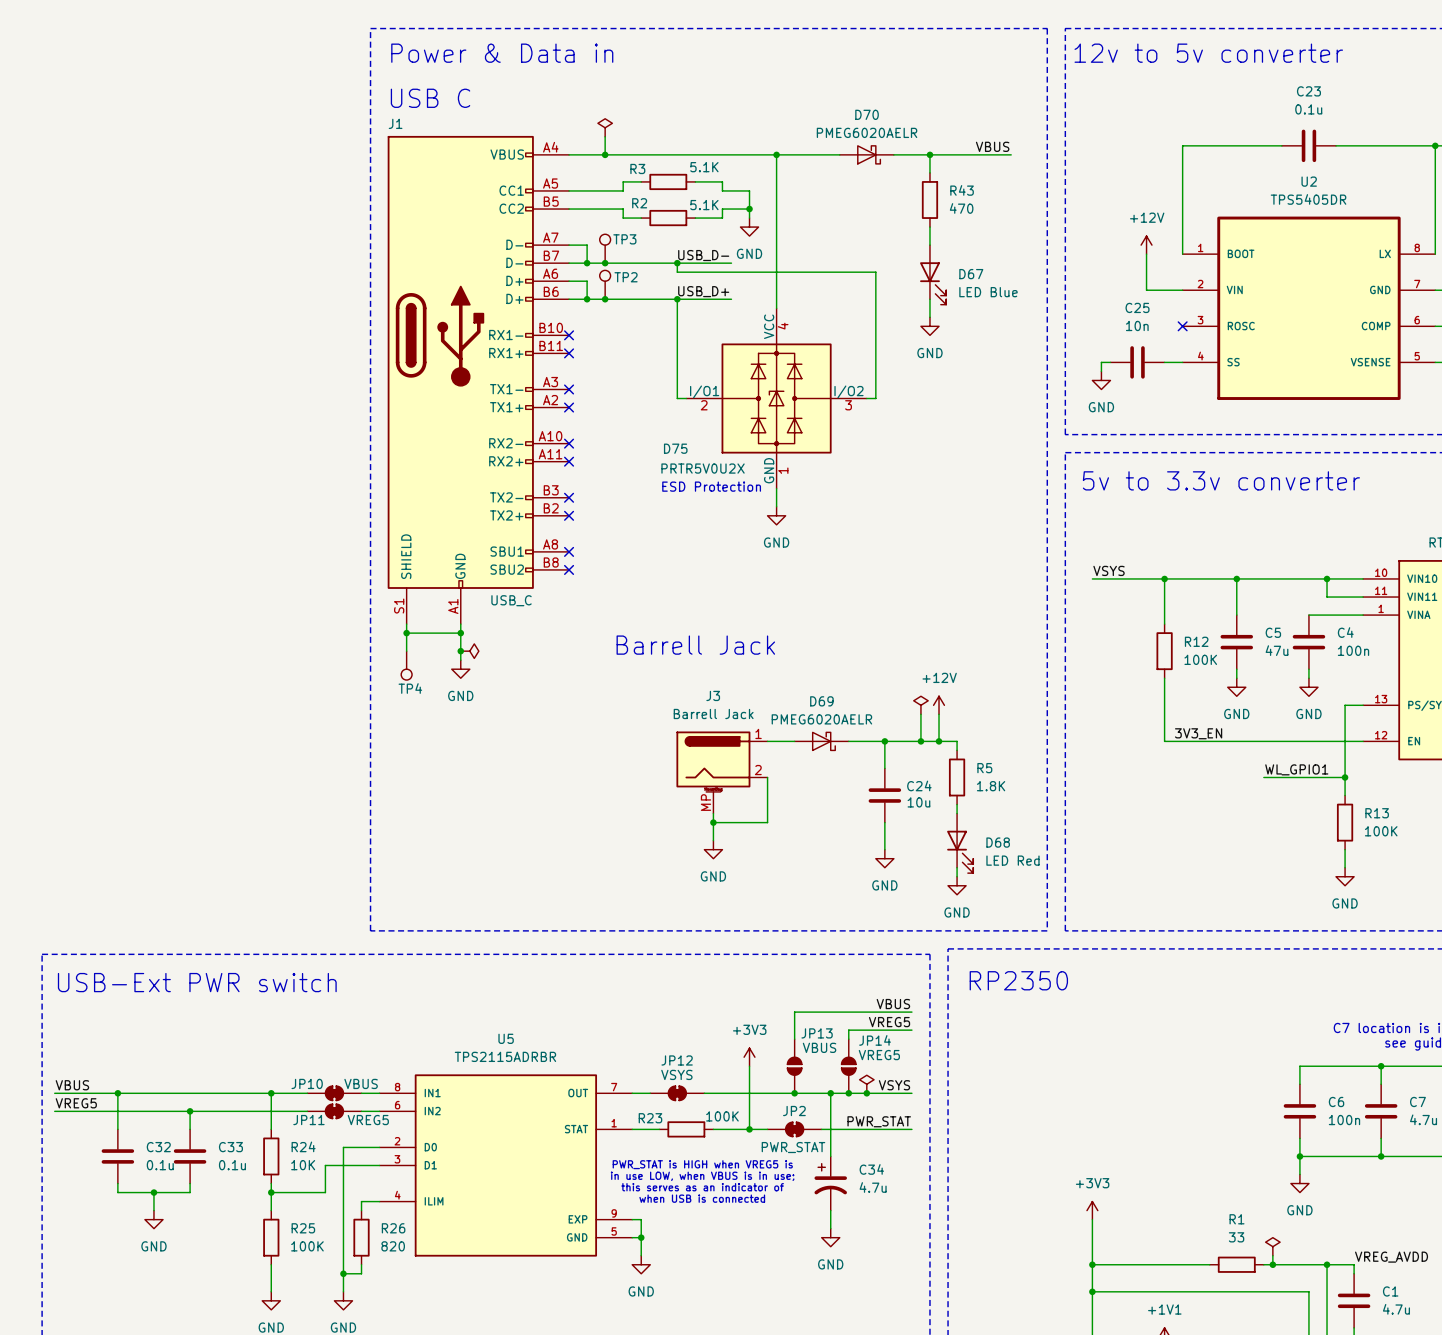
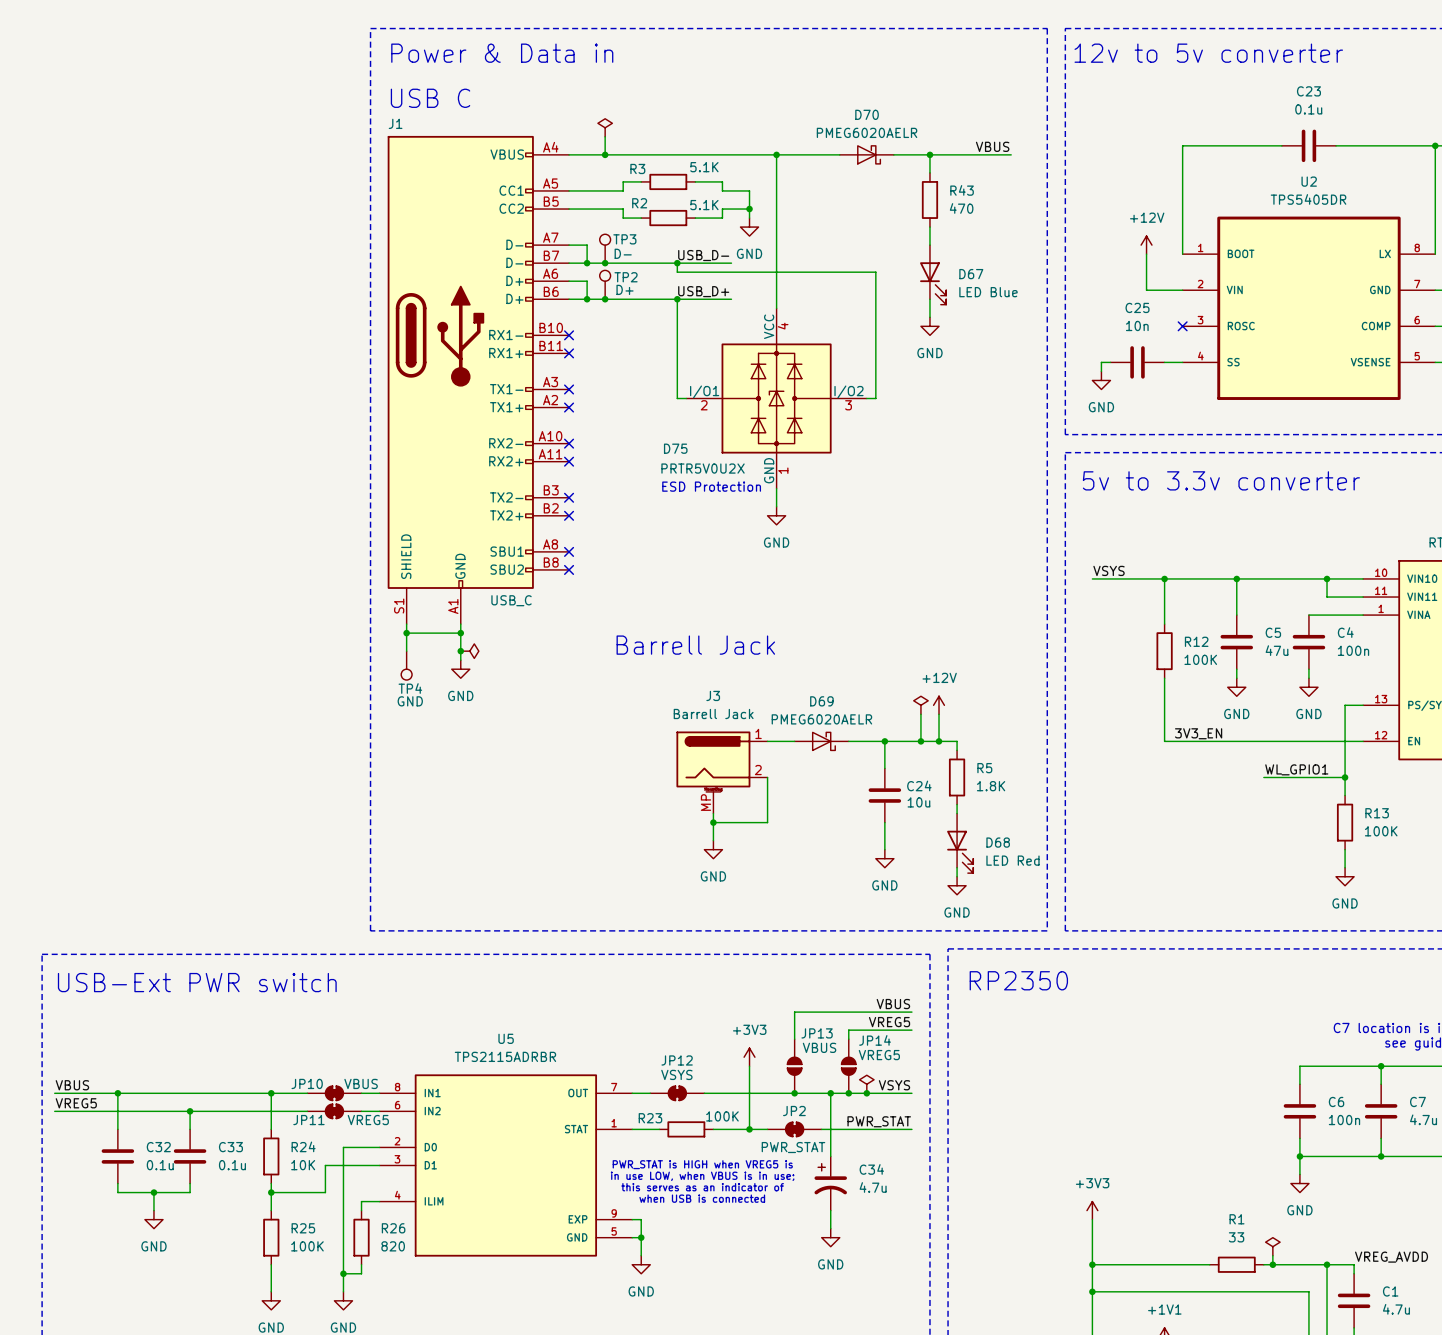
TP3 value: none -> D- (623, 253)
TP2 value: none -> D+ (625, 289)
TP4 value: none -> GND (410, 701)

